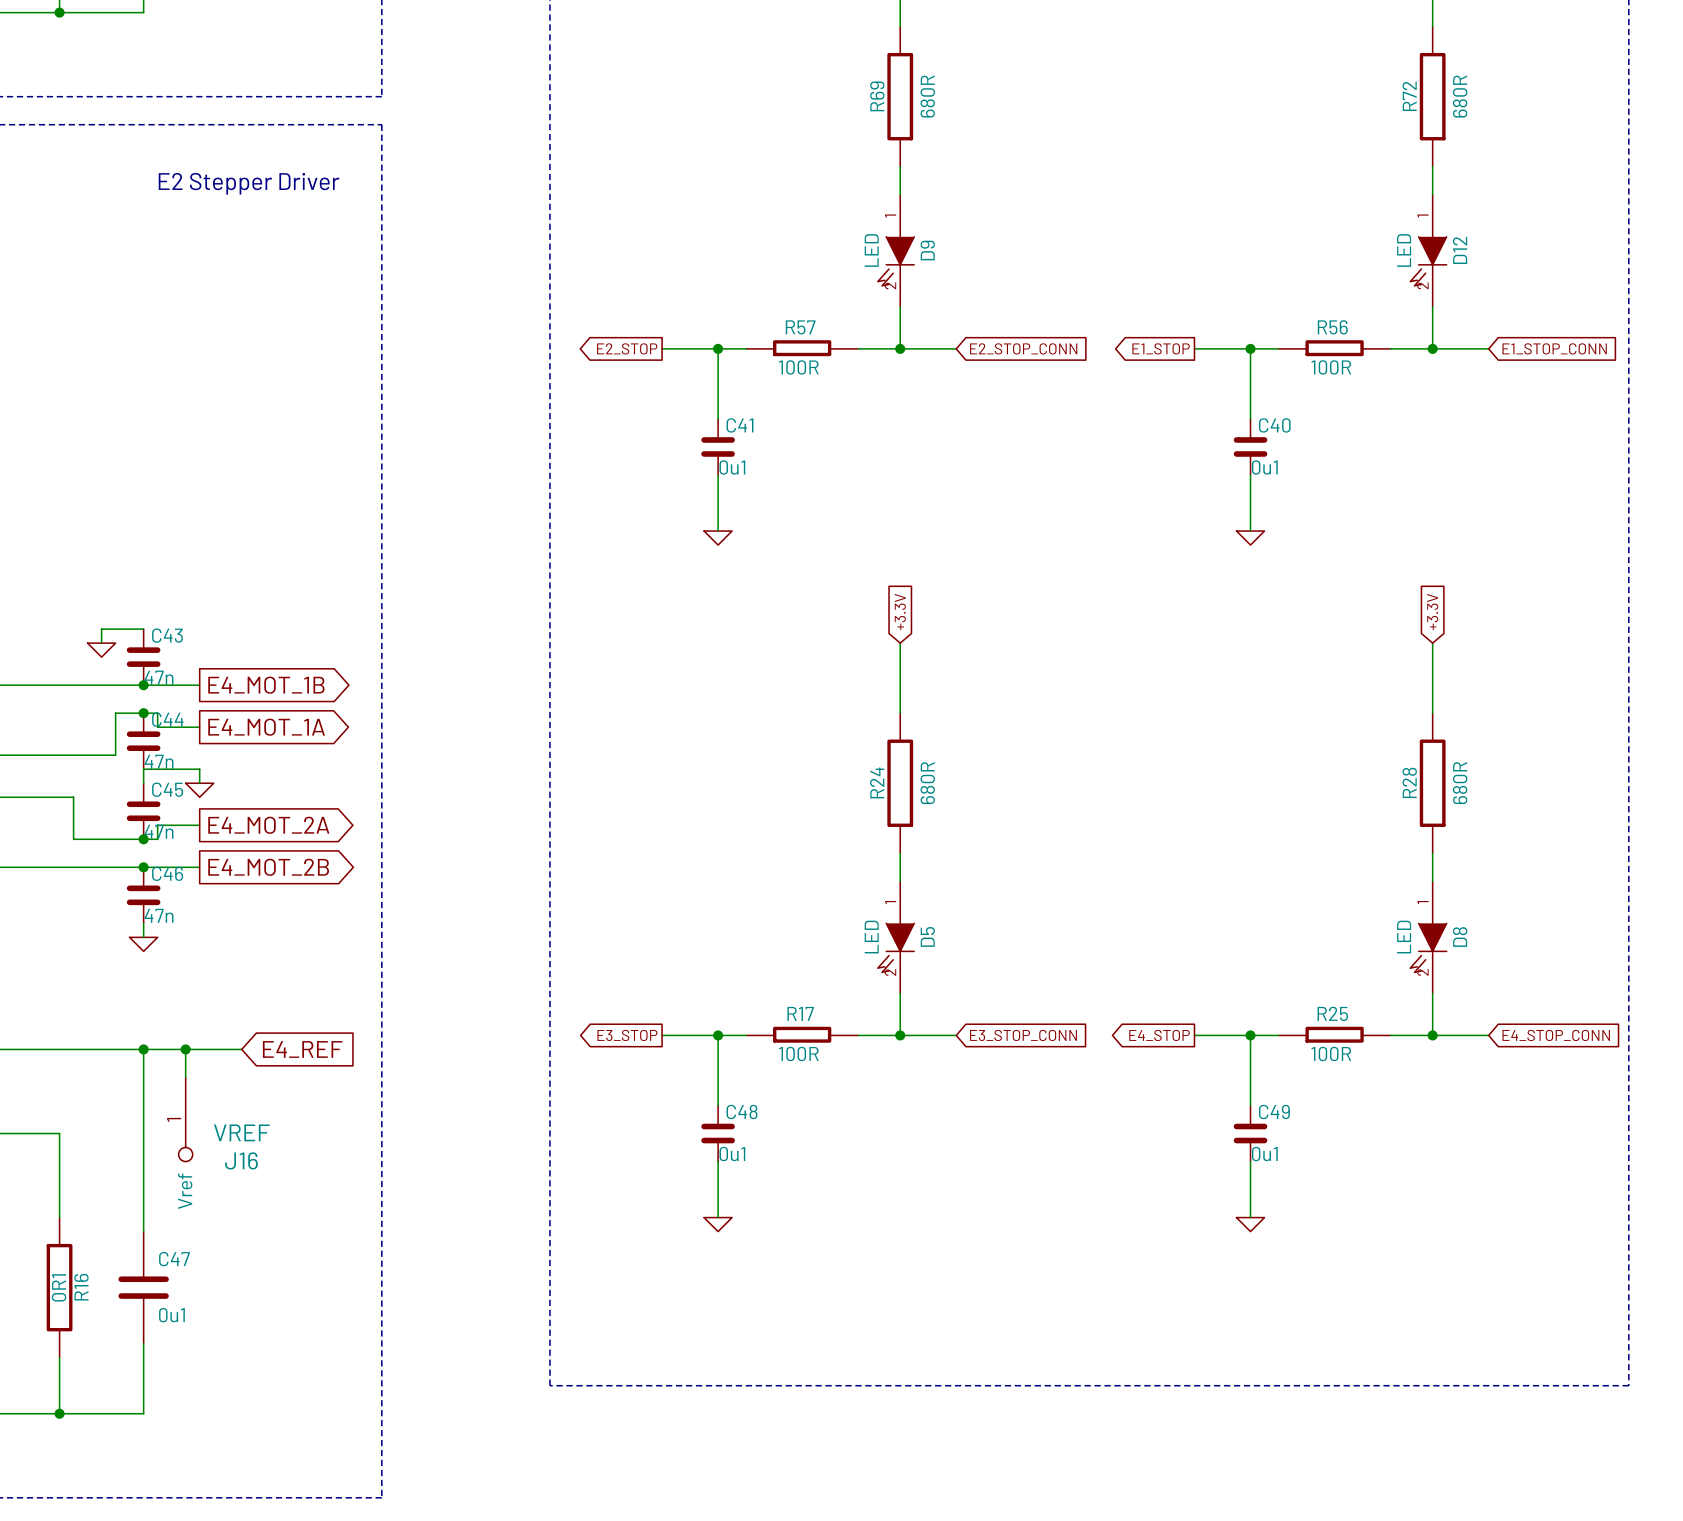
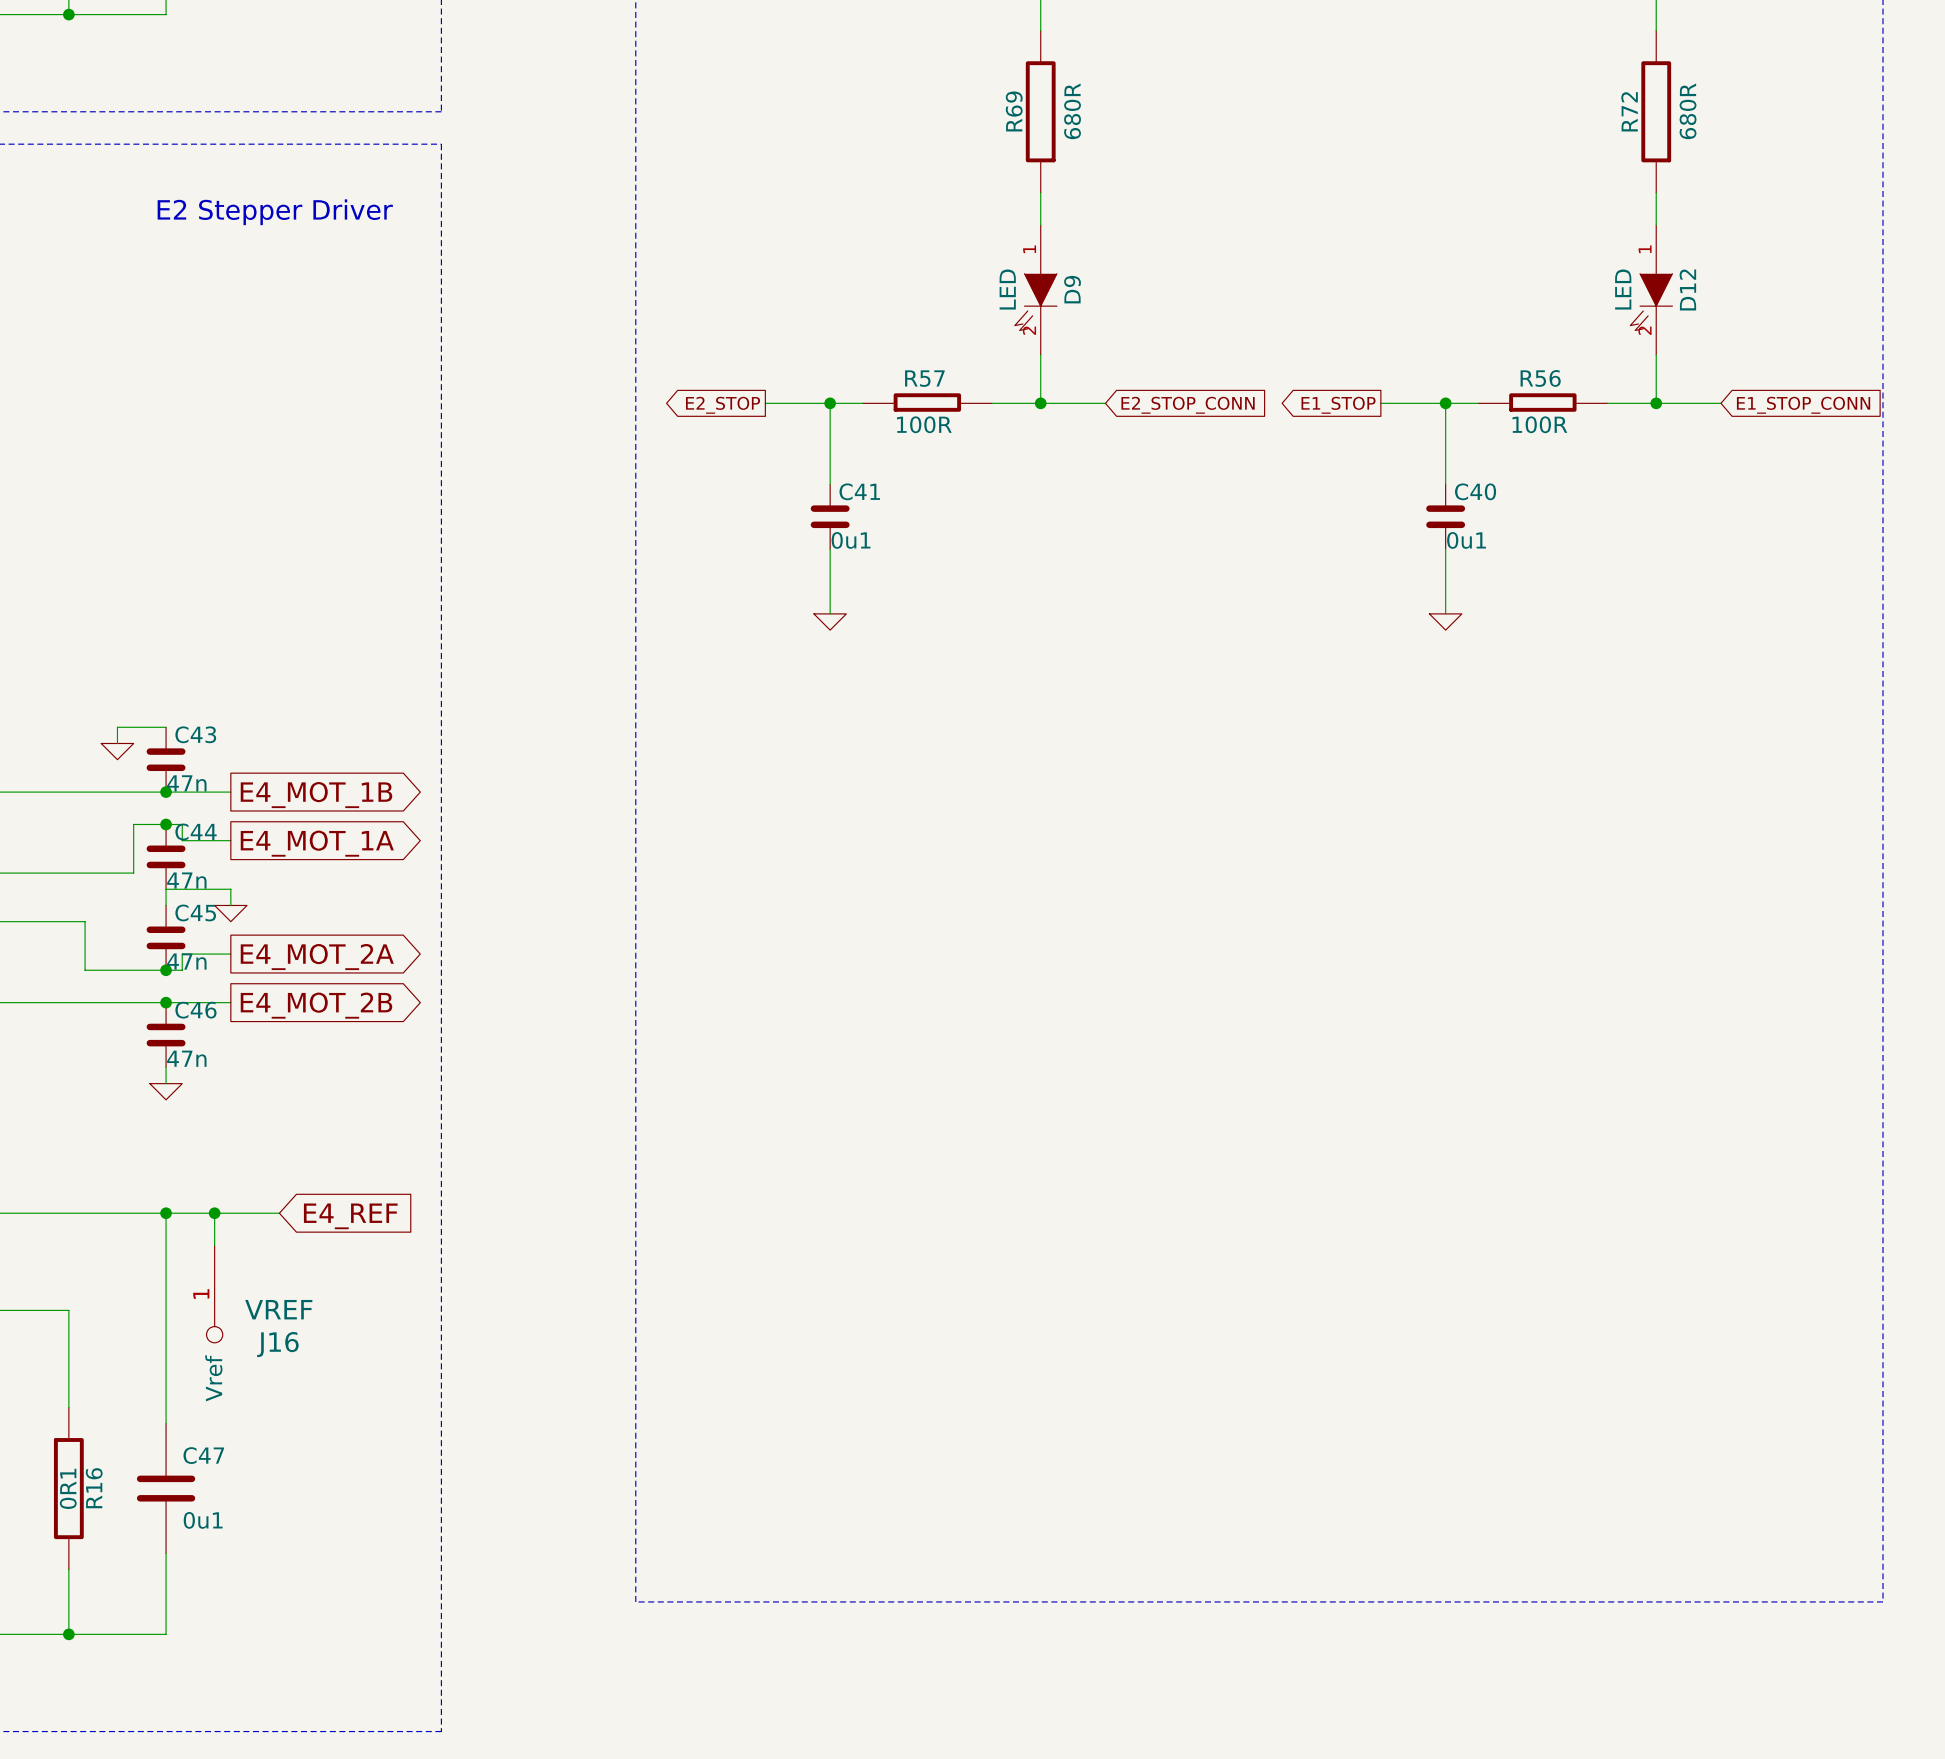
global label: +3.3V (900, 612) -> none
global label: +3.3V (1432, 612) -> none
wire: (900, 643) (900, 713) -> none
wire: (1432, 643) (1432, 713) -> none
R24: 680R (900, 783) -> none
R28: 680R (1432, 783) -> none
wire: (900, 853) (900, 881) -> none
wire: (1432, 853) (1432, 881) -> none
D5: LED (896, 937) -> none
D8: LED (1428, 937) -> none
wire: (900, 993) (900, 1035) -> none
wire: (1432, 993) (1432, 1035) -> none
R17: 100R (802, 1034) -> none
R25: 100R (1334, 1034) -> none
global label: E3_STOP (627, 1035) -> none
wire: (662, 1035) (746, 1035) -> none
wire: (718, 1035) (718, 1105) -> none
junction: (718, 1035) -> none
wire: (858, 1035) (956, 1035) -> none
junction: (900, 1035) -> none
global label: E3_STOP_CONN (1023, 1035) -> none
global label: E4_STOP (1159, 1035) -> none
wire: (1194, 1035) (1278, 1035) -> none
wire: (1250, 1035) (1250, 1105) -> none
junction: (1250, 1035) -> none
wire: (1390, 1035) (1488, 1035) -> none
junction: (1432, 1035) -> none
global label: E4_STOP_CONN (1556, 1035) -> none
C48: 0u1 (718, 1133) -> none
C49: 0u1 (1250, 1133) -> none
wire: (718, 1161) (718, 1217) -> none
wire: (1250, 1161) (1250, 1217) -> none
power symbol: (718, 1224) -> none
power symbol: (1250, 1224) -> none

